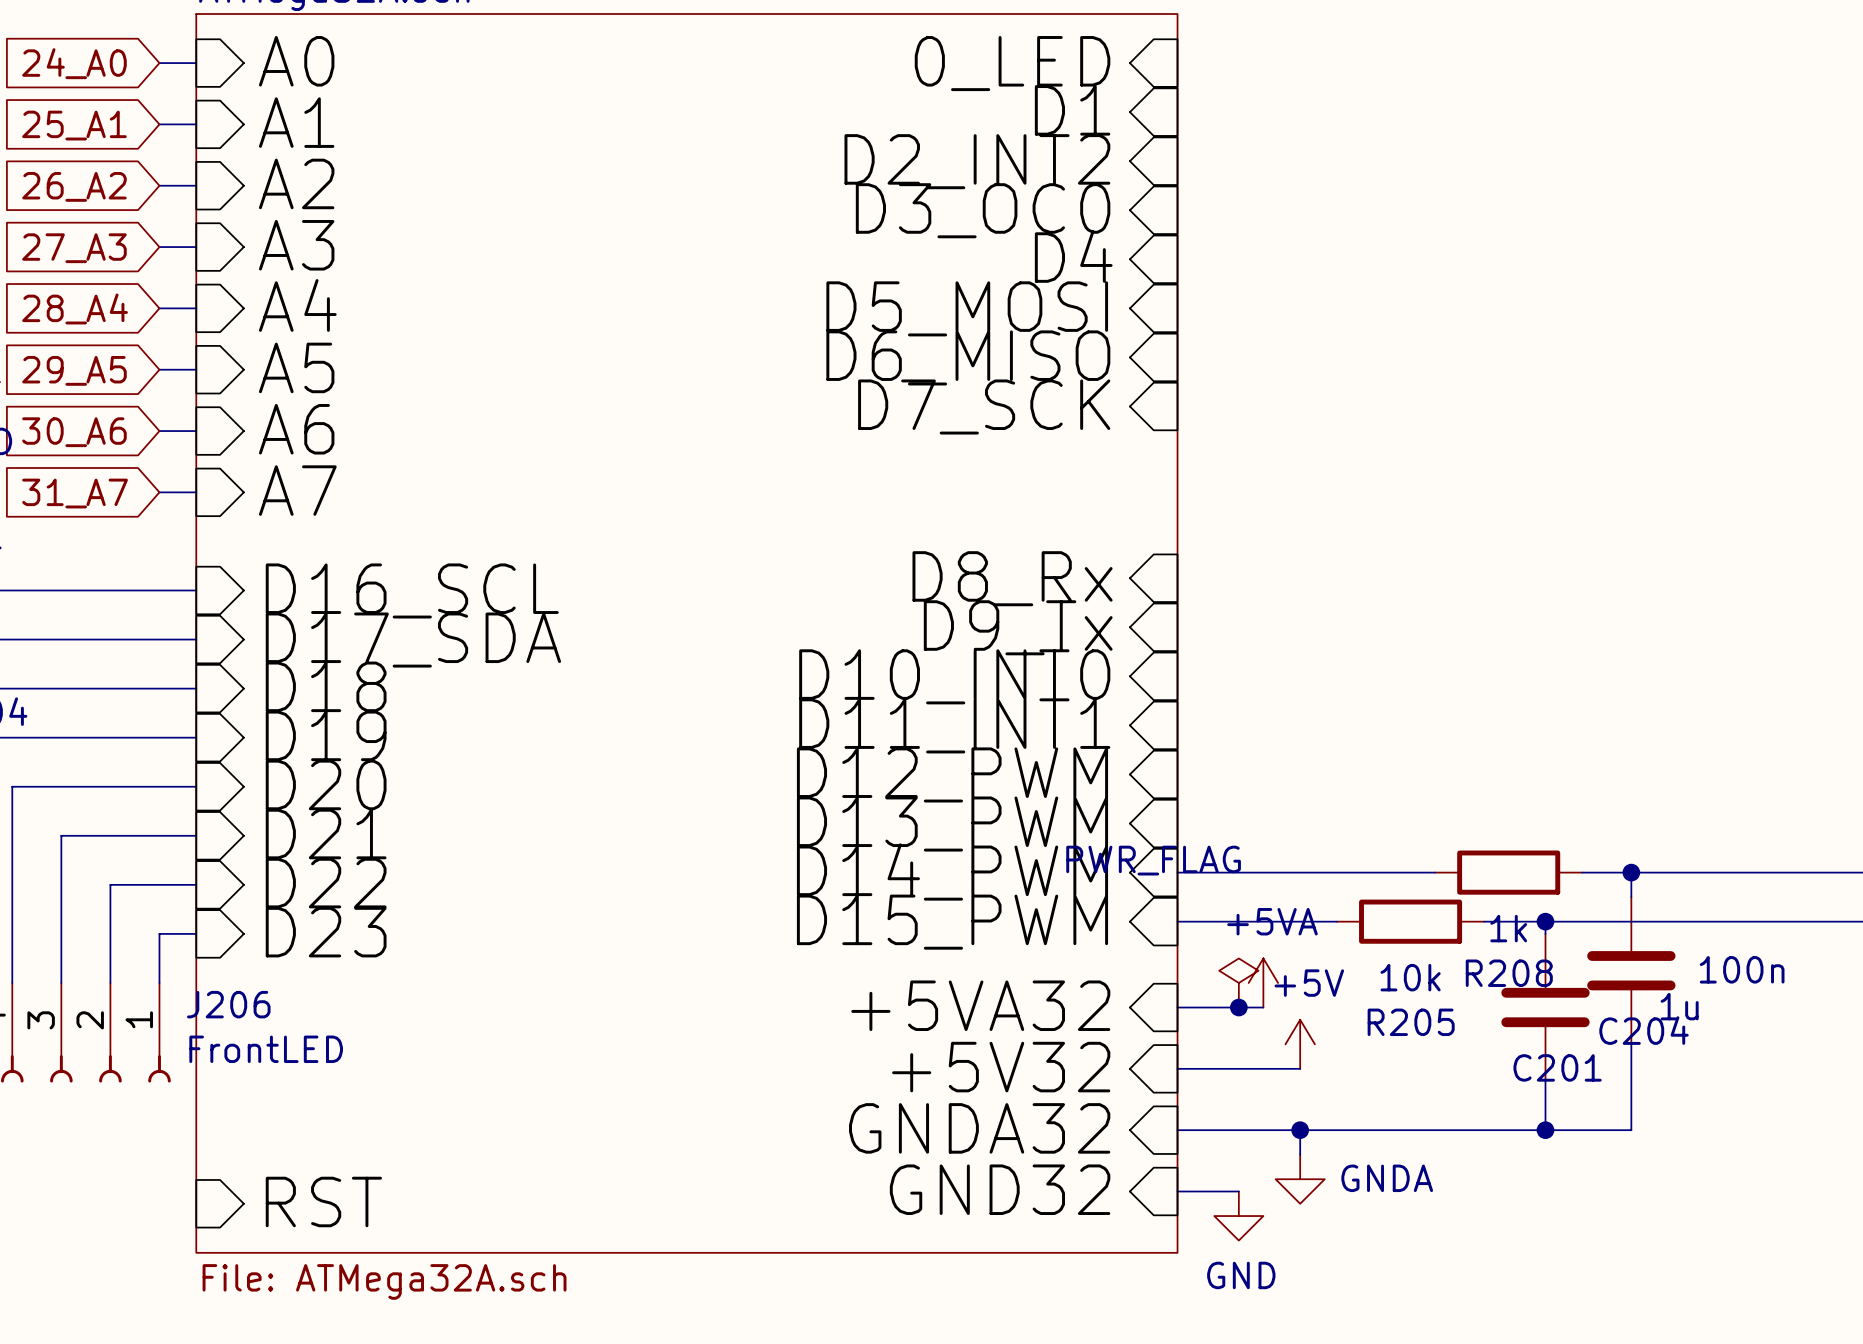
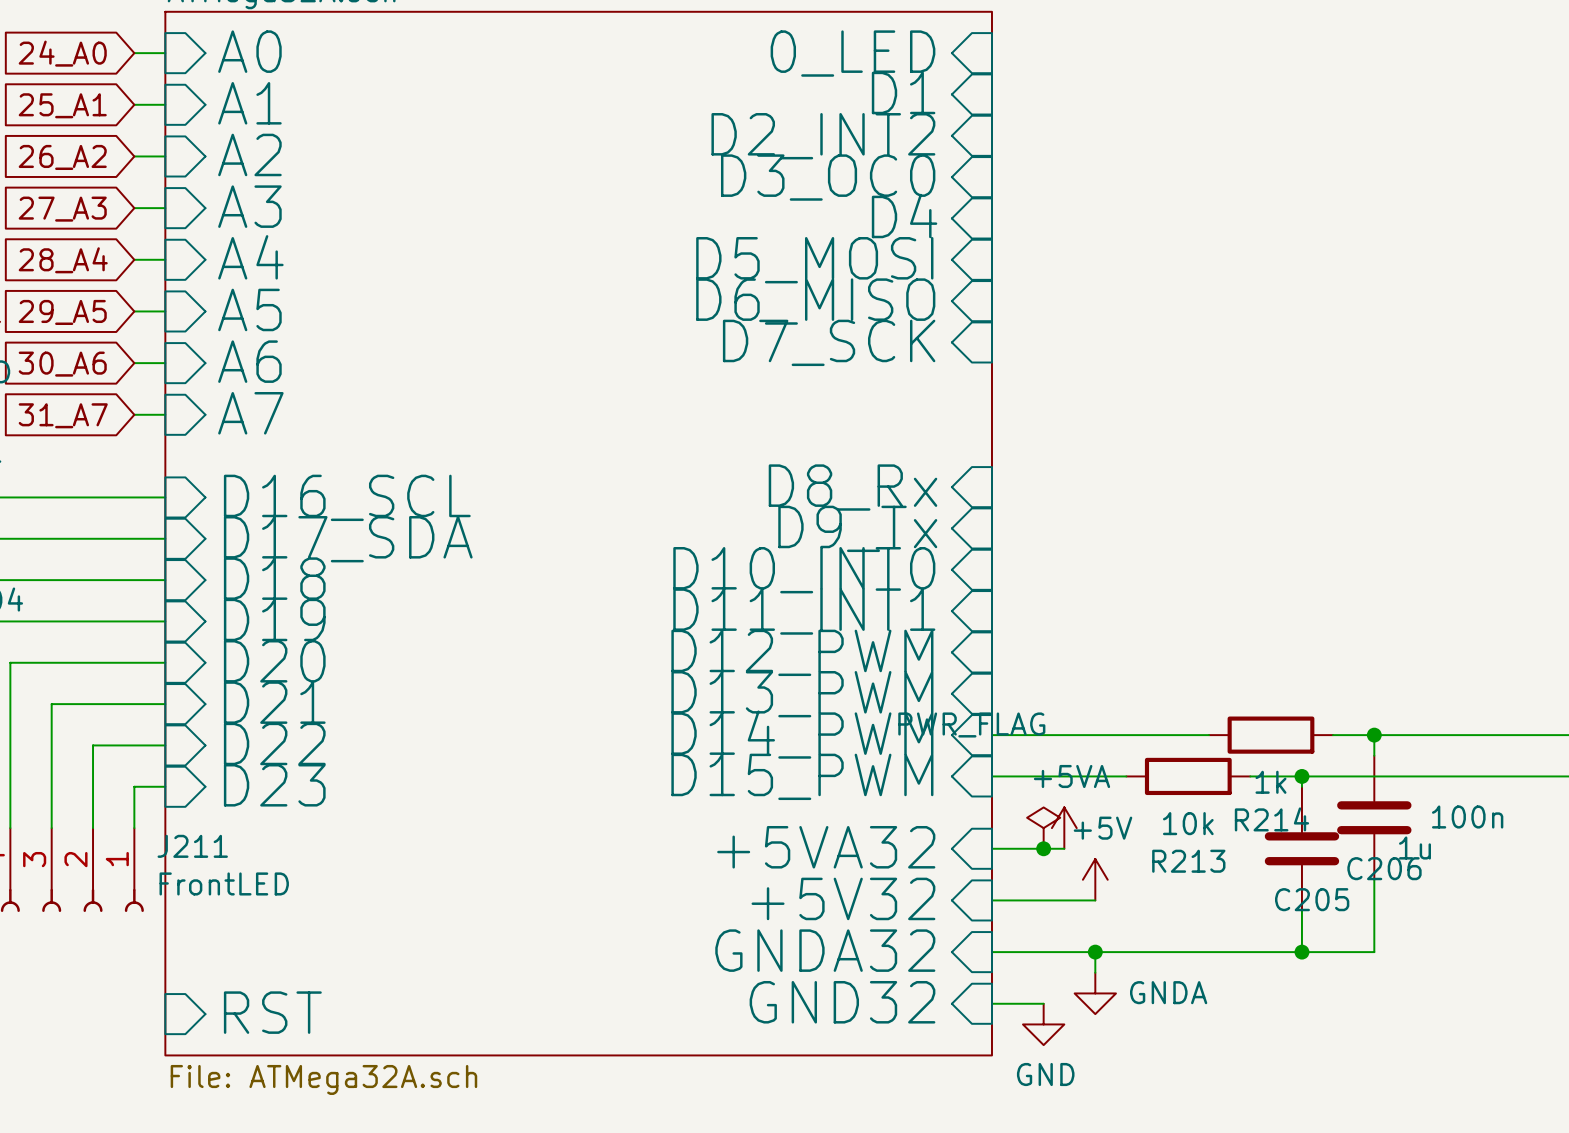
R208 name: R208 (1509, 973) -> R214 (1271, 819)
J206 name: J206 (228, 1004) -> J211 (192, 846)
R205 name: R205 (1411, 1022) -> R213 (1188, 861)
C204 name: C204 (1644, 1030) -> C206 (1384, 868)
C201 name: C201 (1557, 1067) -> C205 (1312, 899)

